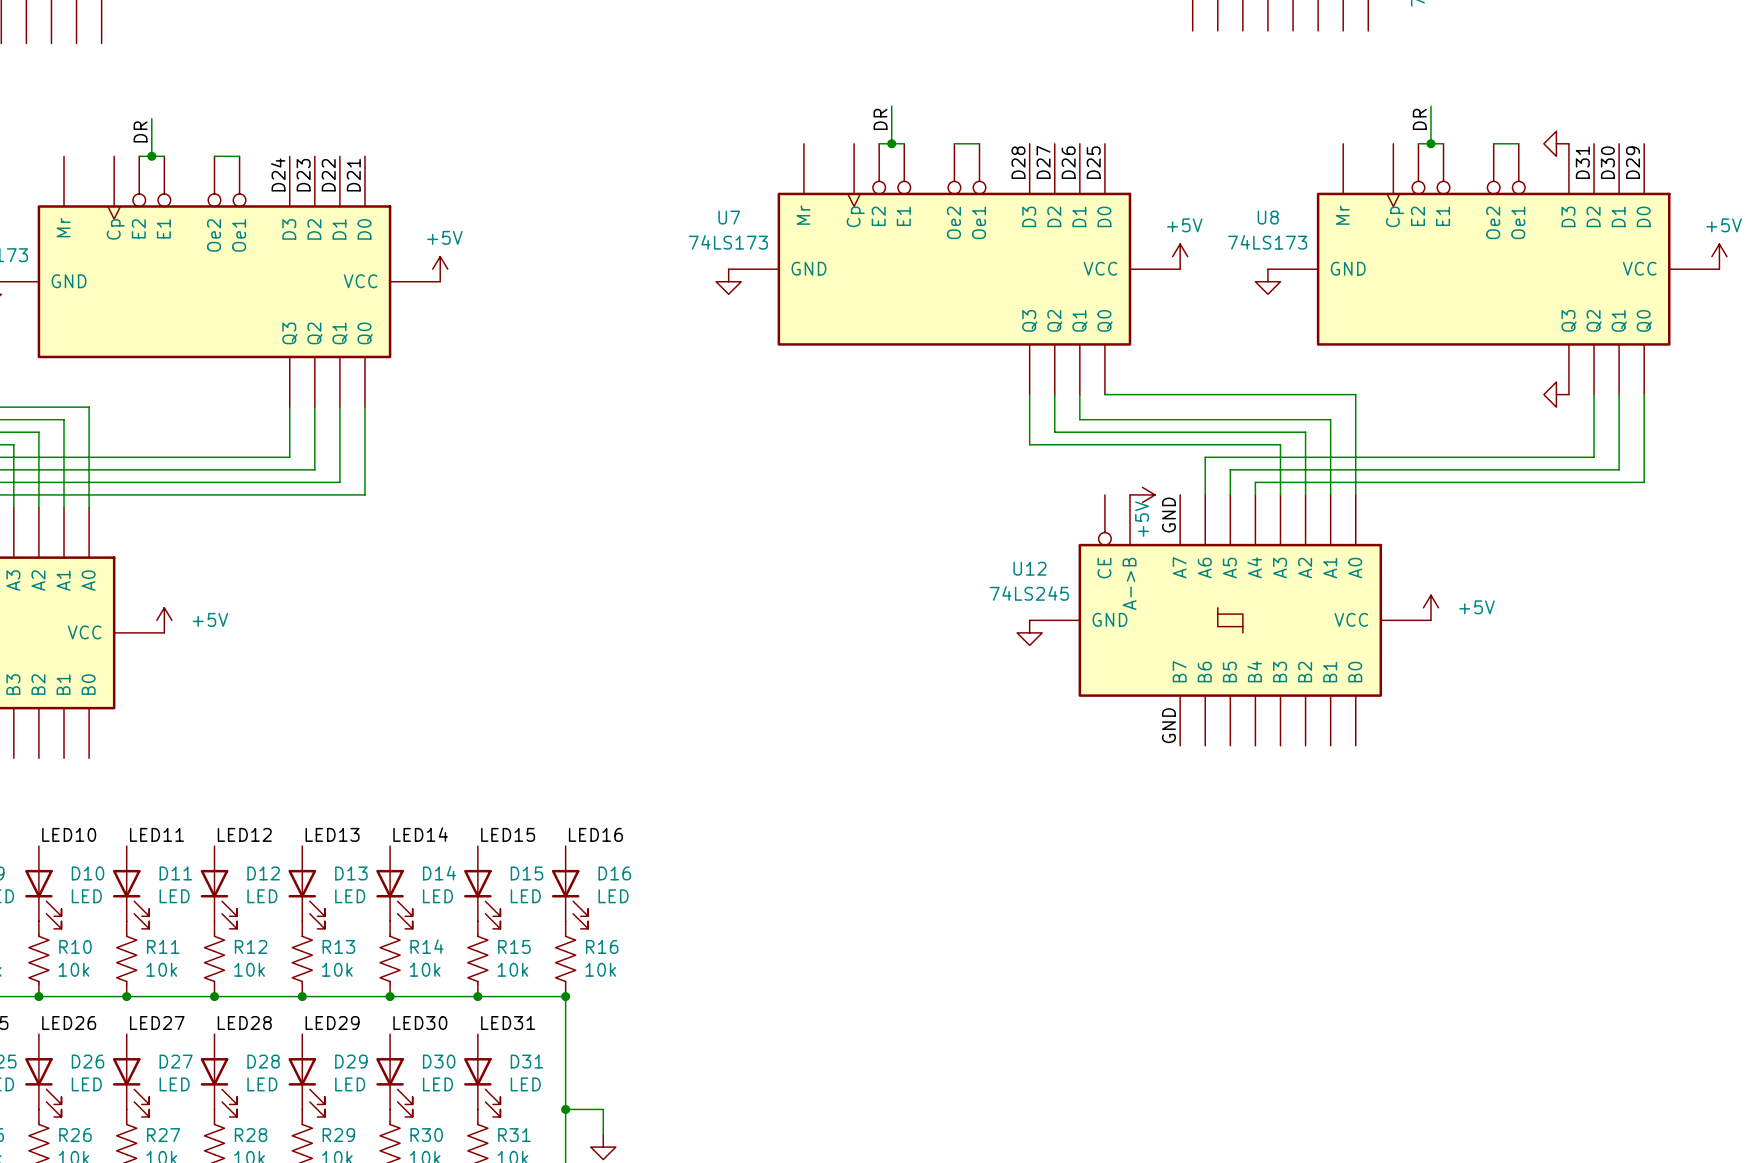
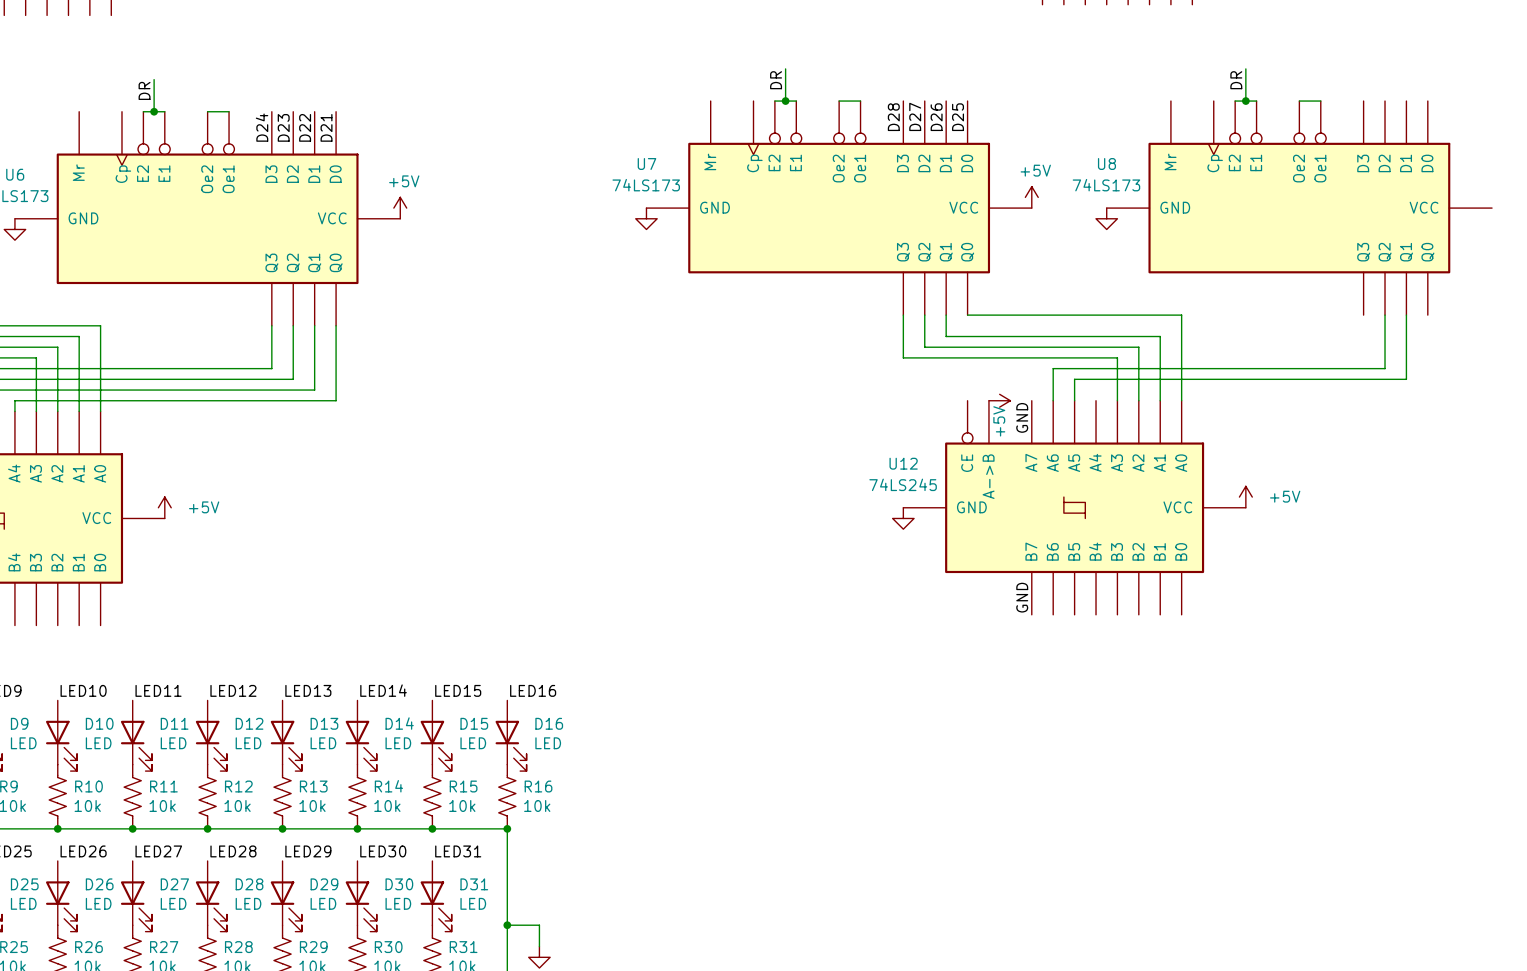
power symbol: (1556, 143) -> none
label: D31 (1582, 162) -> none
label: D30 (1607, 162) -> none
label: D29 (1632, 162) -> none
power symbol: +5V (1719, 256) -> none
power symbol: (1556, 394) -> none
wire: (1644, 394) (1644, 482) (1255, 482) (1255, 494) -> none

